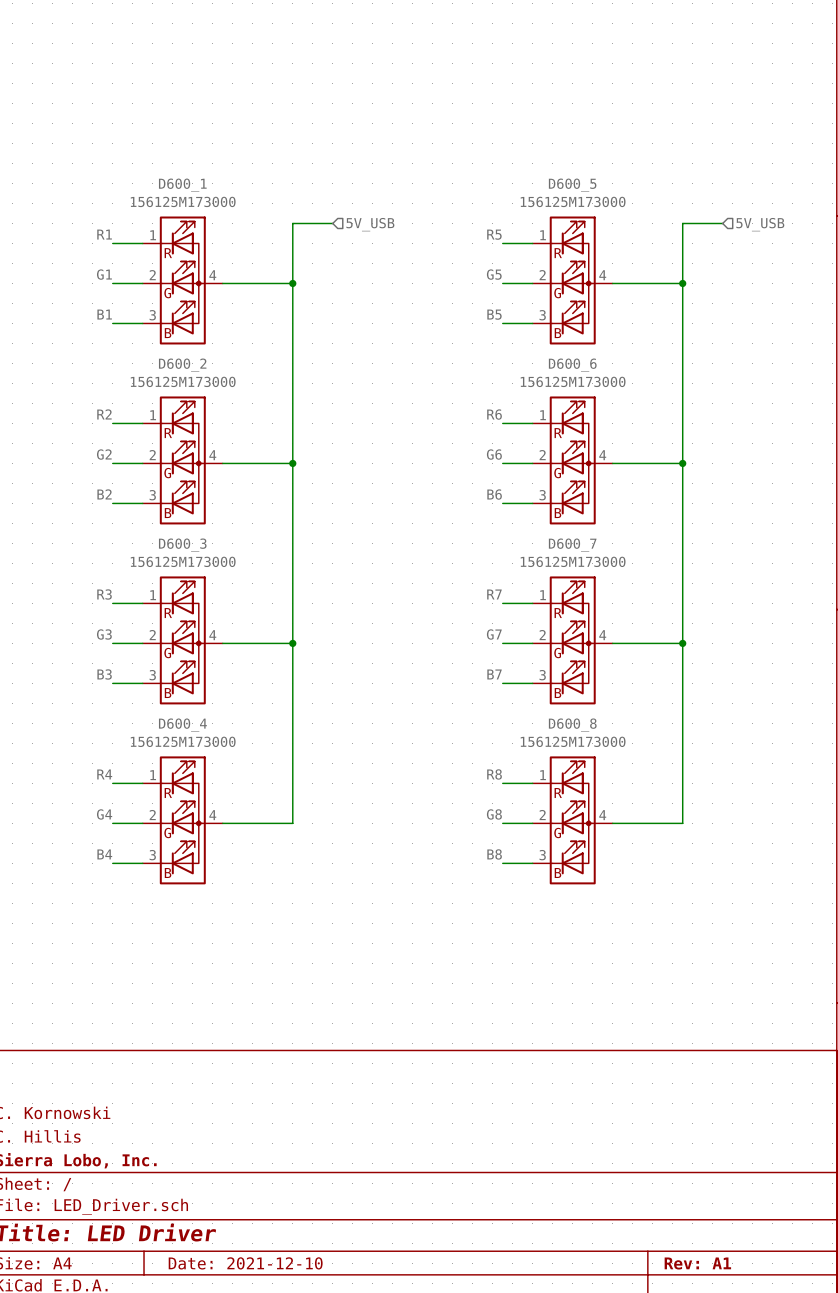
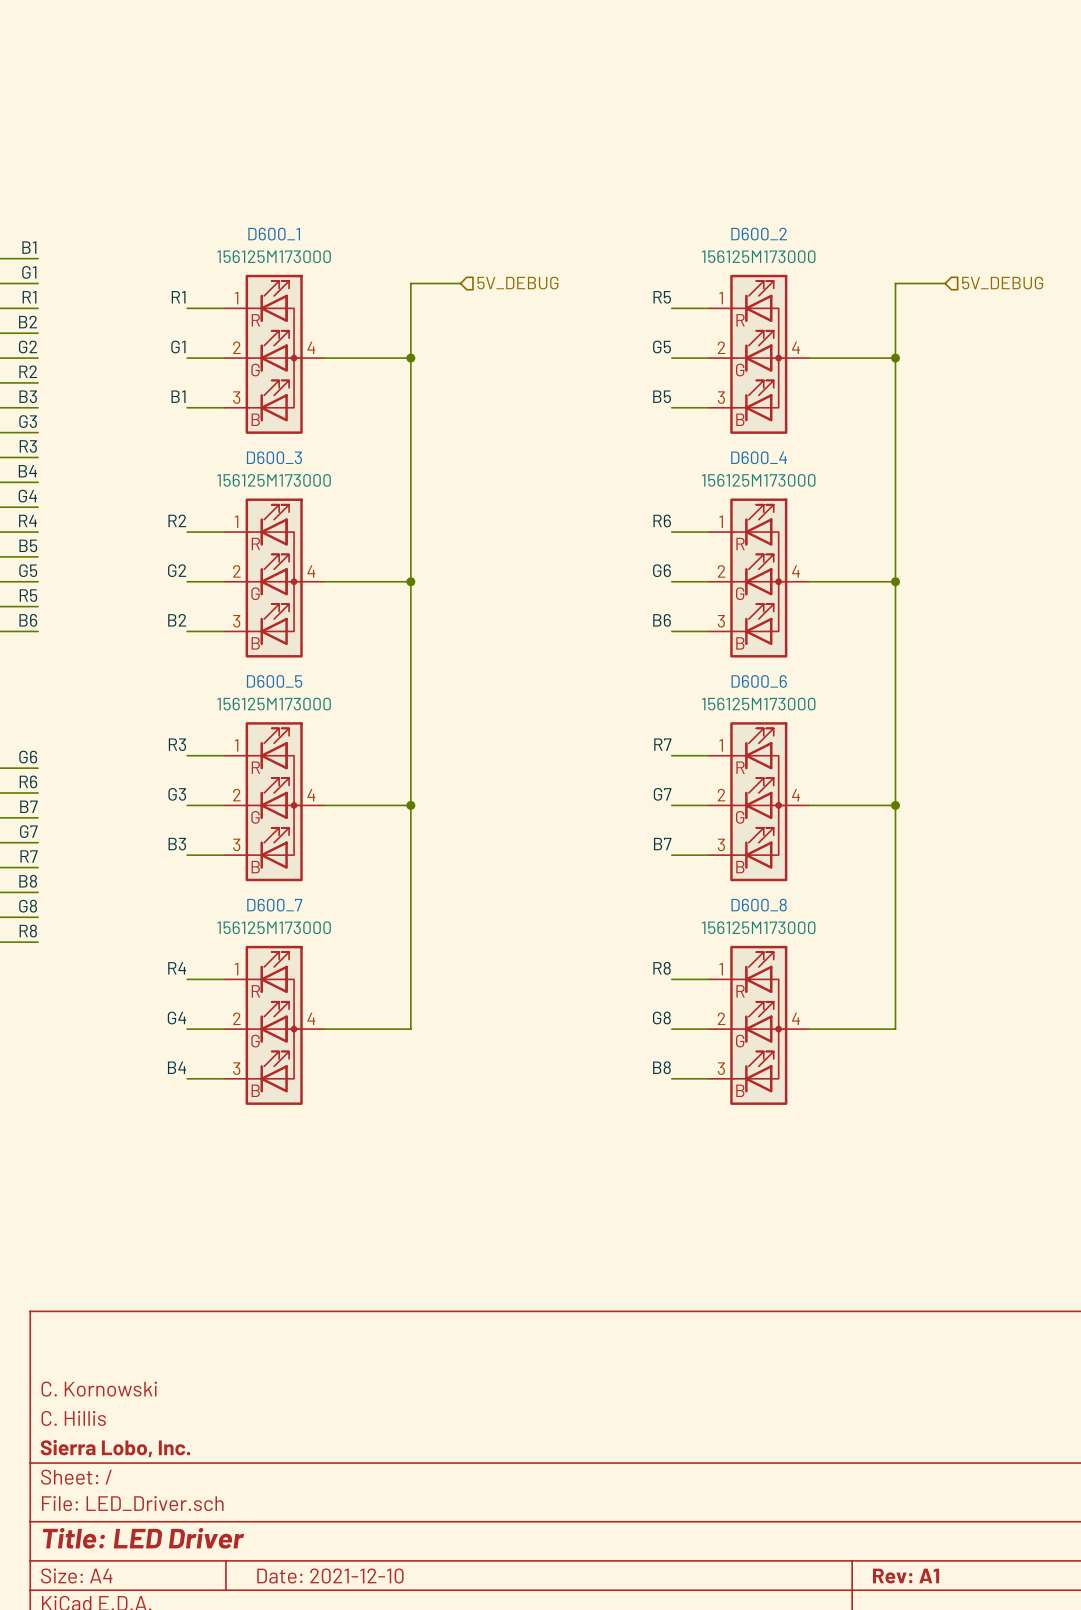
D600_5 name: D600_5 (572, 185) -> D600_2 (759, 234)
hierarchical label: 5V_USB (370, 224) -> 5V_DEBUG (517, 283)
hierarchical label: 5V_USB (760, 224) -> 5V_DEBUG (1002, 283)
D600_2 name: D600_2 (182, 365) -> D600_3 (274, 457)
D600_6 name: D600_6 (572, 365) -> D600_4 (759, 457)
D600_3 name: D600_3 (182, 545) -> D600_5 (274, 681)
D600_7 name: D600_7 (572, 545) -> D600_6 (759, 681)
D600_4 name: D600_4 (182, 725) -> D600_7 (274, 905)

